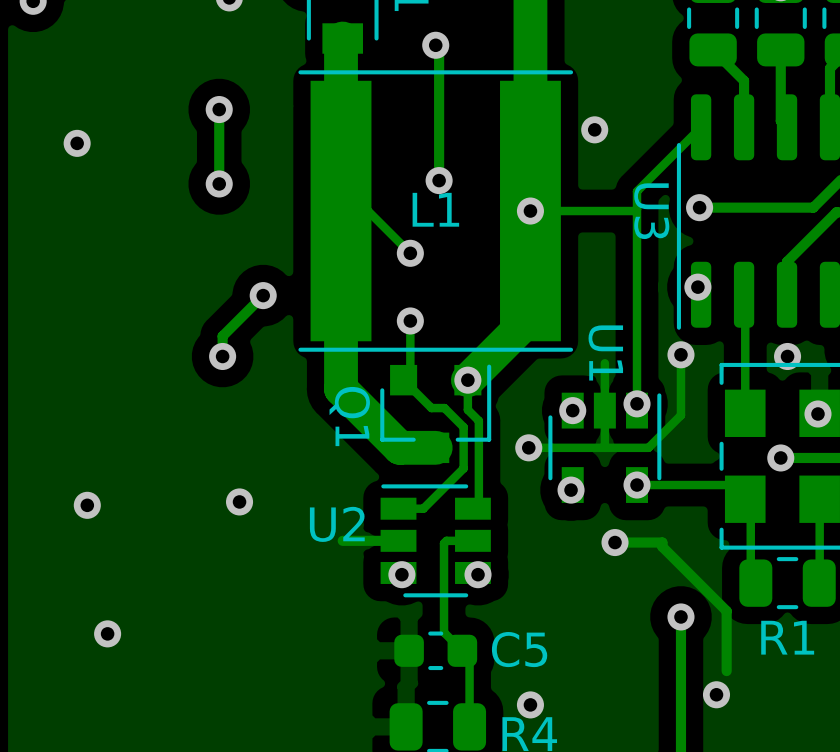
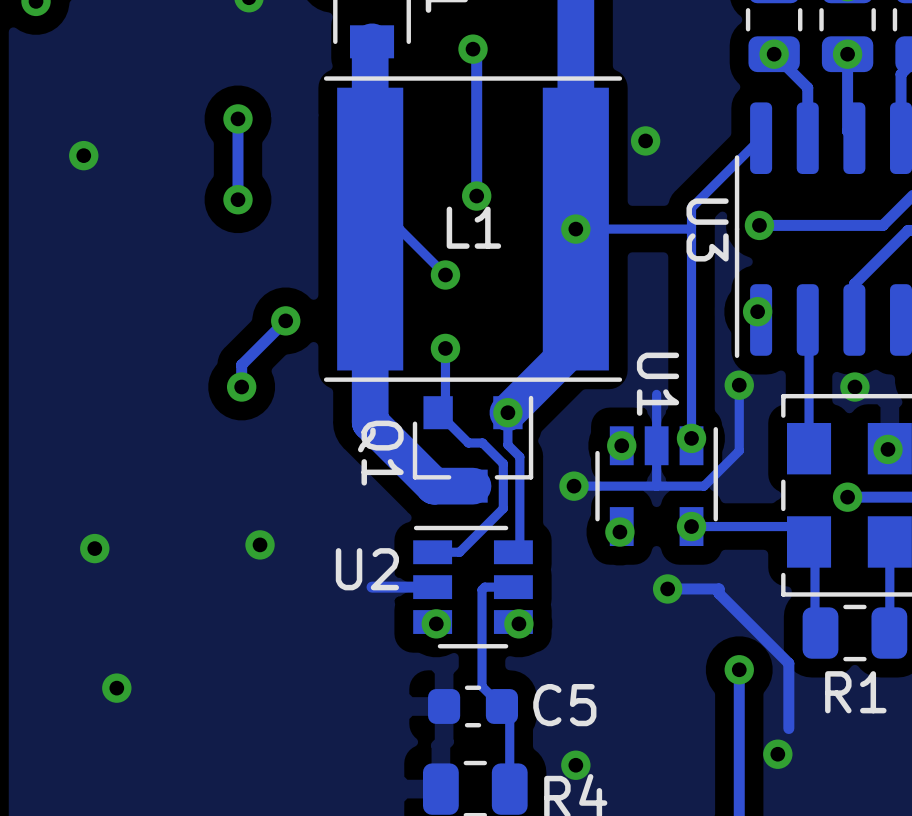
via: none -> (774, 54)
via: none -> (847, 54)

